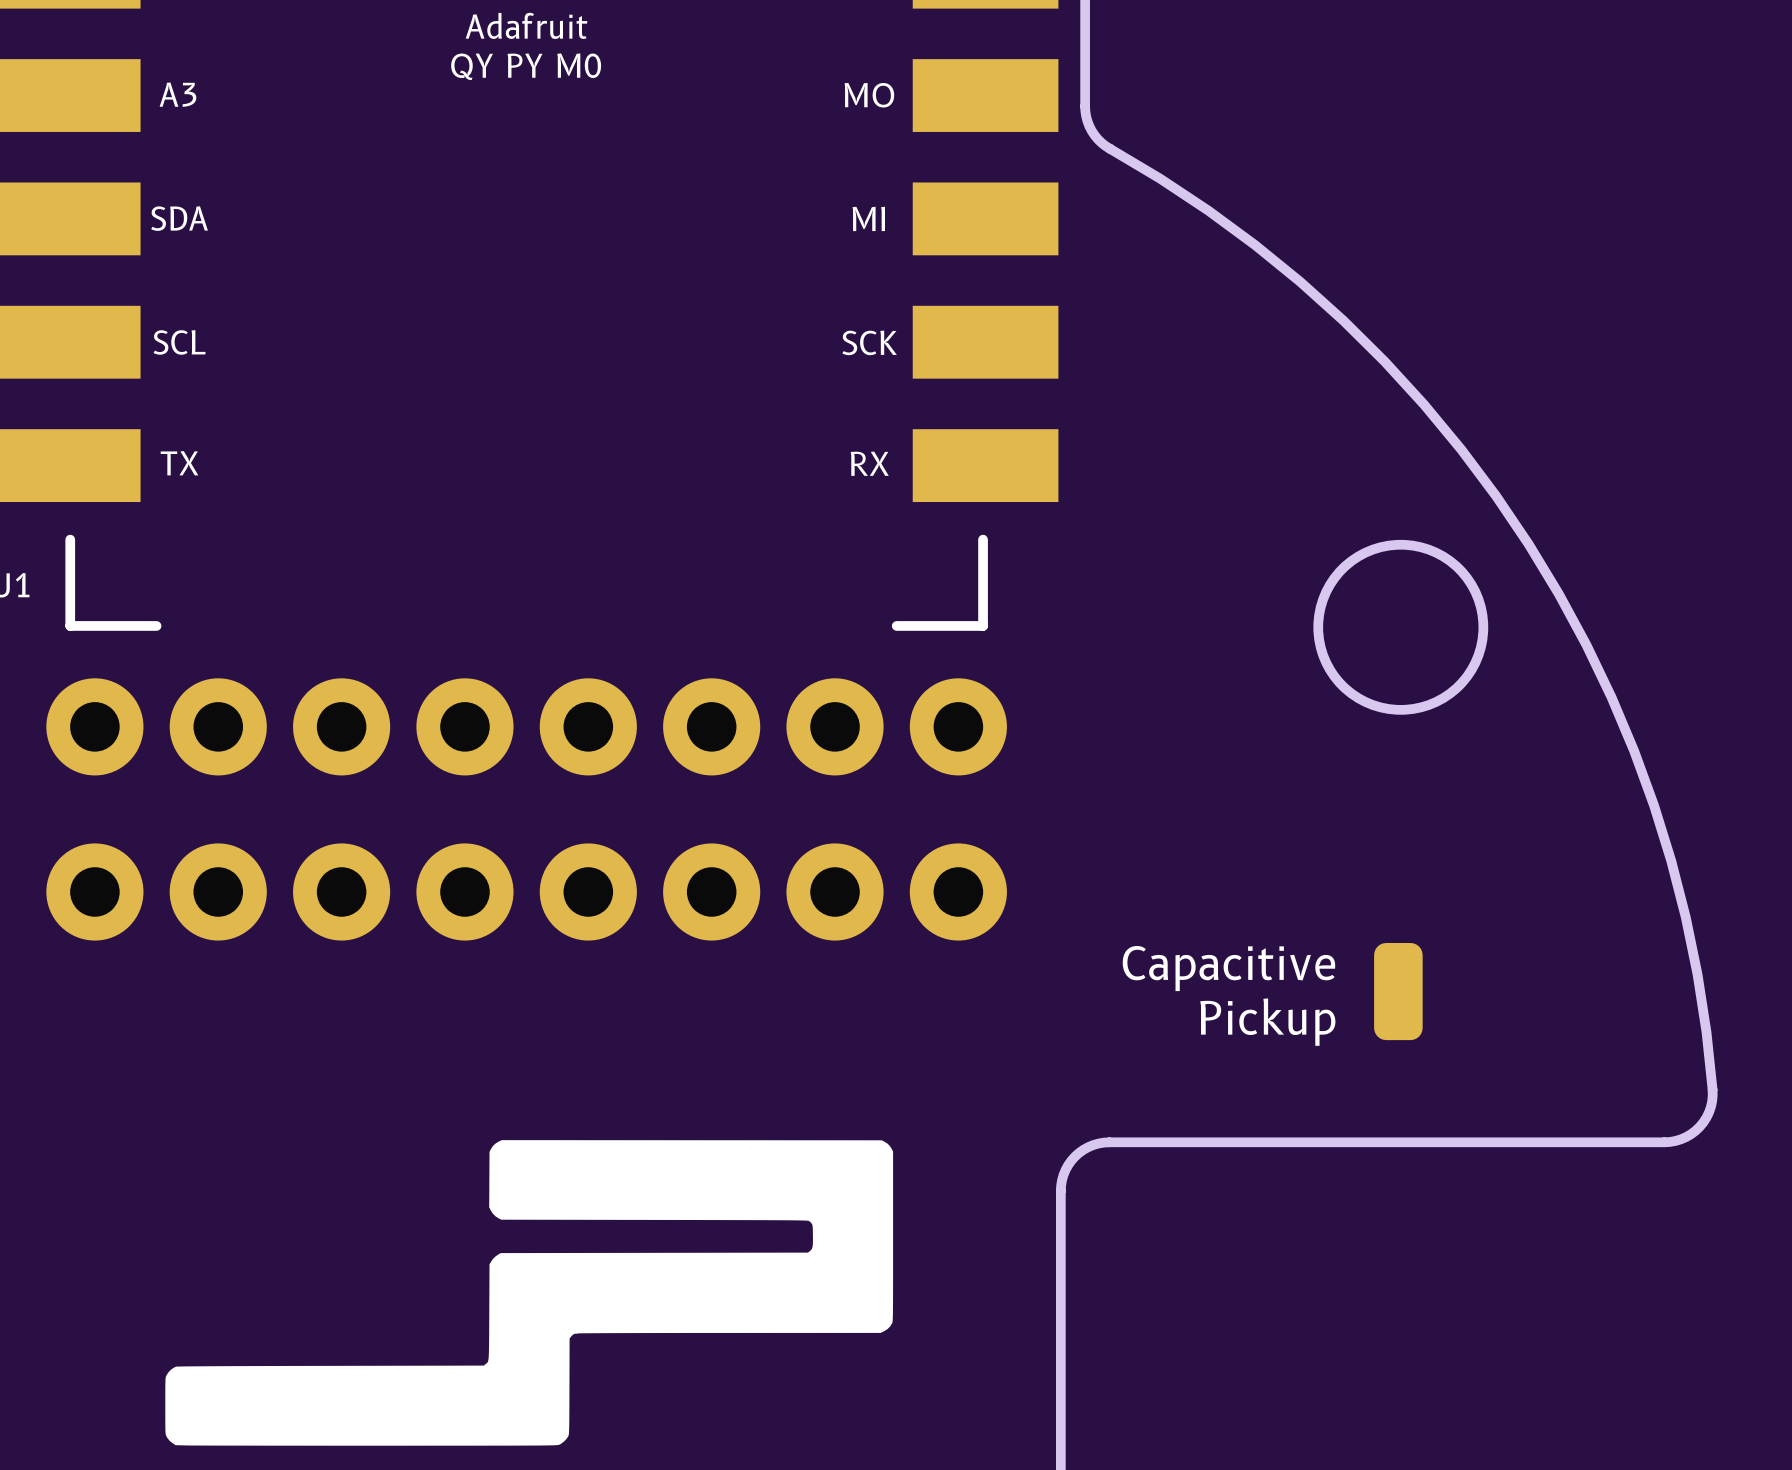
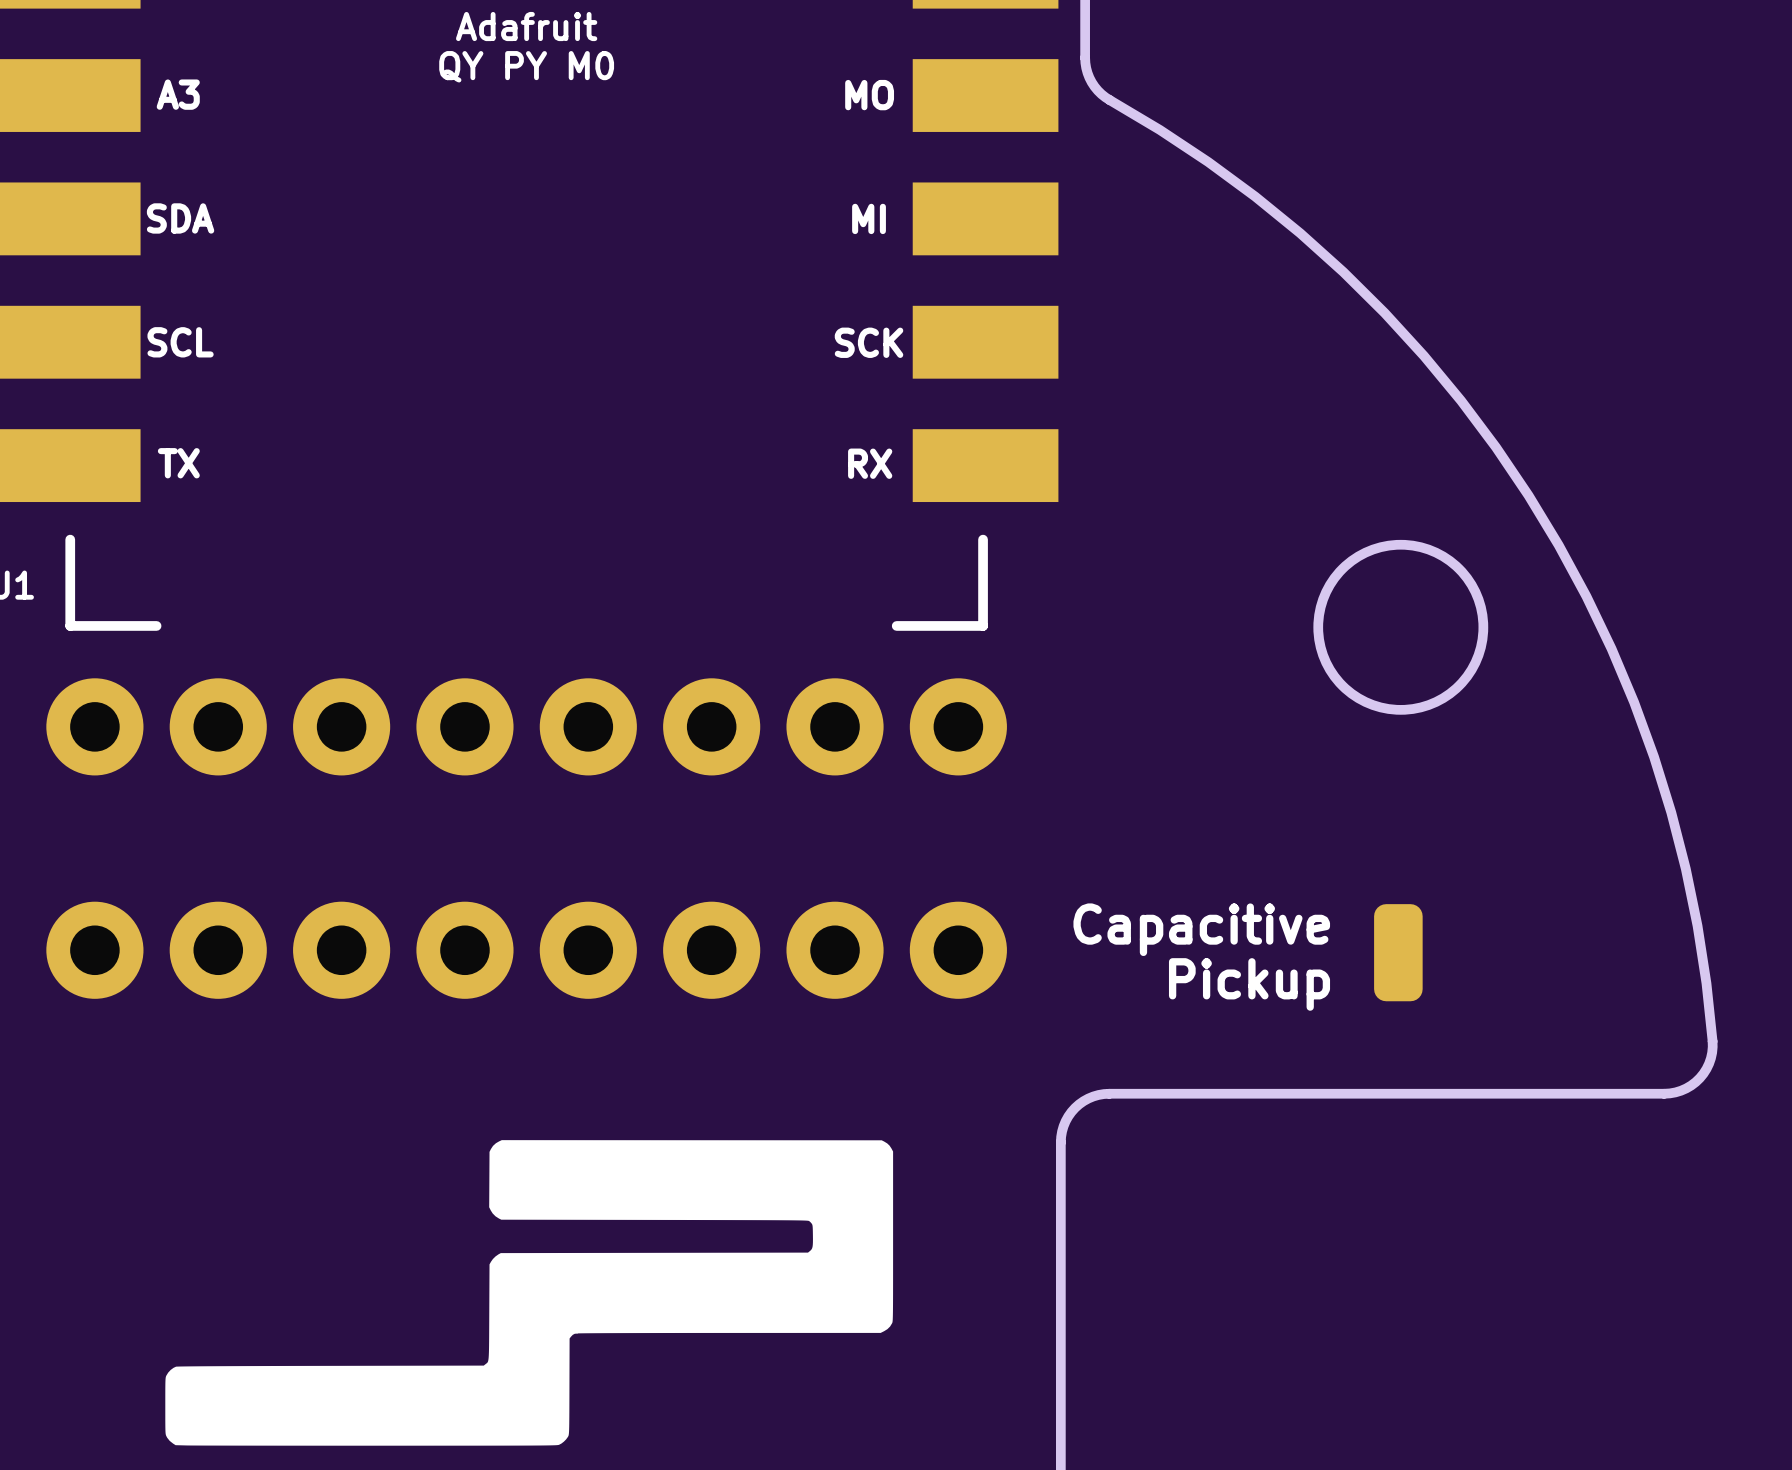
board edge: (1085, 57) (1085, 111) (1089, 126) (1097, 139) (1105, 145) (1208, 210) (1255, 245) (1343, 320) (1384, 361) (1461, 449) (1496, 495) (1558, 593) (1586, 644) (1634, 751) (1671, 861) (1697, 974) (1706, 1031) (1712, 1095) (1709, 1112) (1699, 1126) (1686, 1137) (1669, 1141) (1103, 1142) (1088, 1147) (1075, 1156) (1063, 1174) (1060, 1190) -> (1085, 57) (1089, 77) (1101, 94) (1208, 162) (1300, 233) (1343, 272) (1384, 313) (1461, 400) (1528, 495) (1586, 596) (1634, 702) (1654, 757) (1671, 812) (1697, 925) (1706, 983) (1712, 1046) (1709, 1063) (1699, 1078) (1686, 1088) (1669, 1093) (1098, 1094) (1088, 1098) (1075, 1107) (1063, 1126) (1060, 1142) (1060, 1190)
part position: (526, 891) -> (526, 950)
text position: Capacitive (1228, 968) -> Capacitive (1201, 929)
part position: (1398, 991) -> (1398, 952)
text position: Pickup (1267, 1022) -> Pickup (1249, 984)

